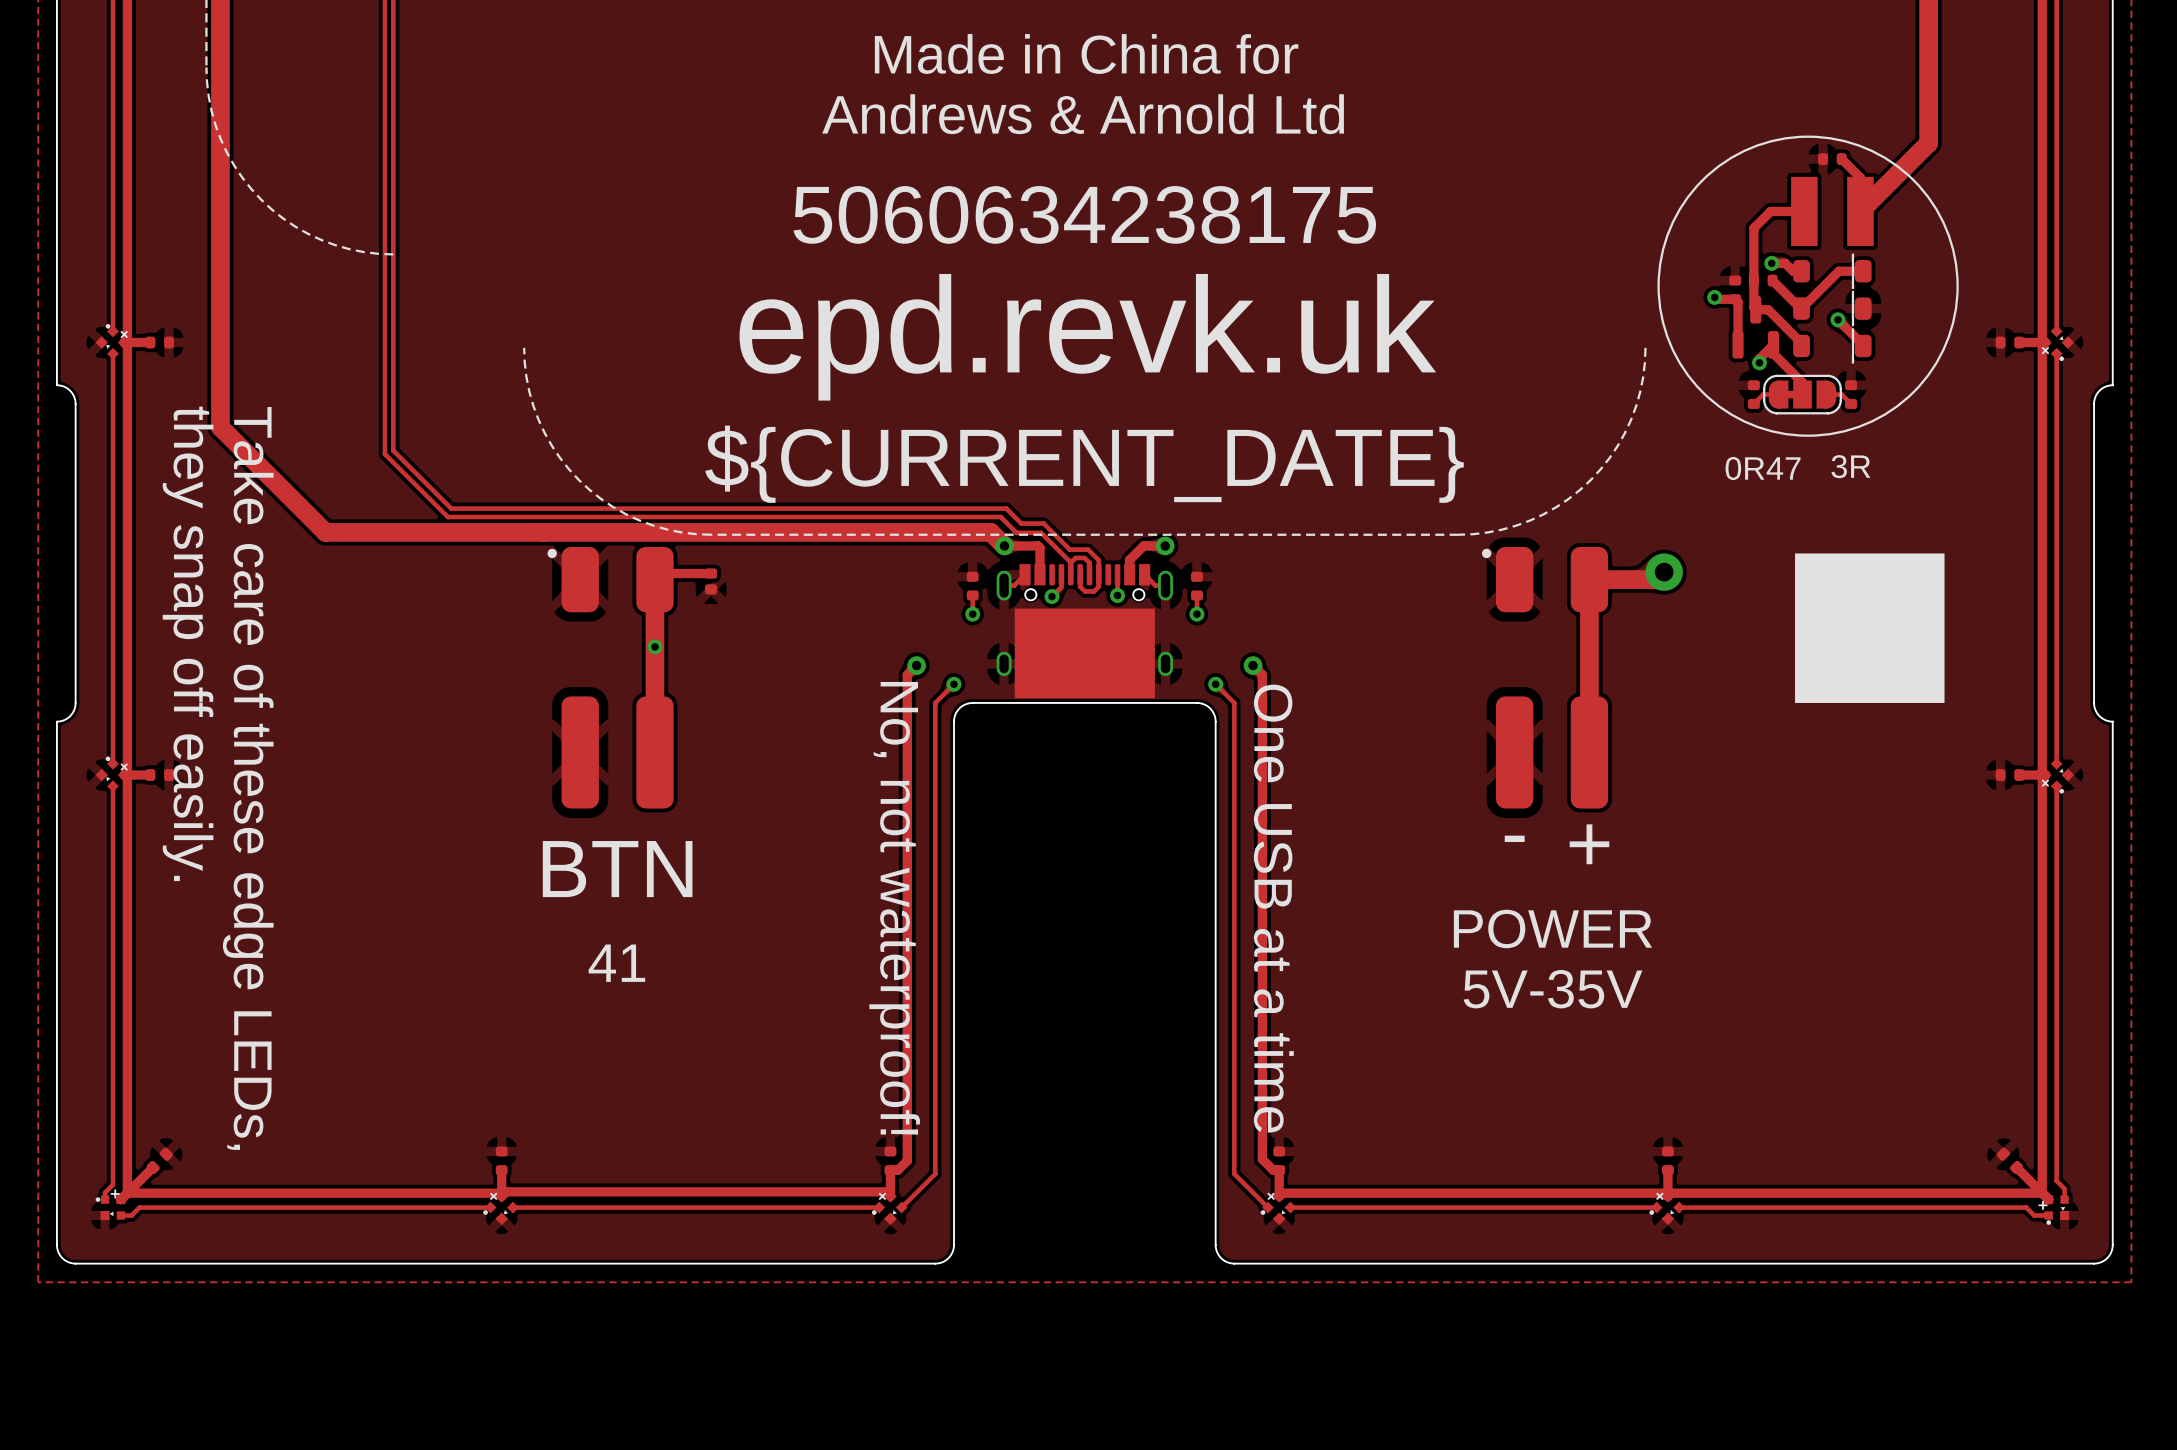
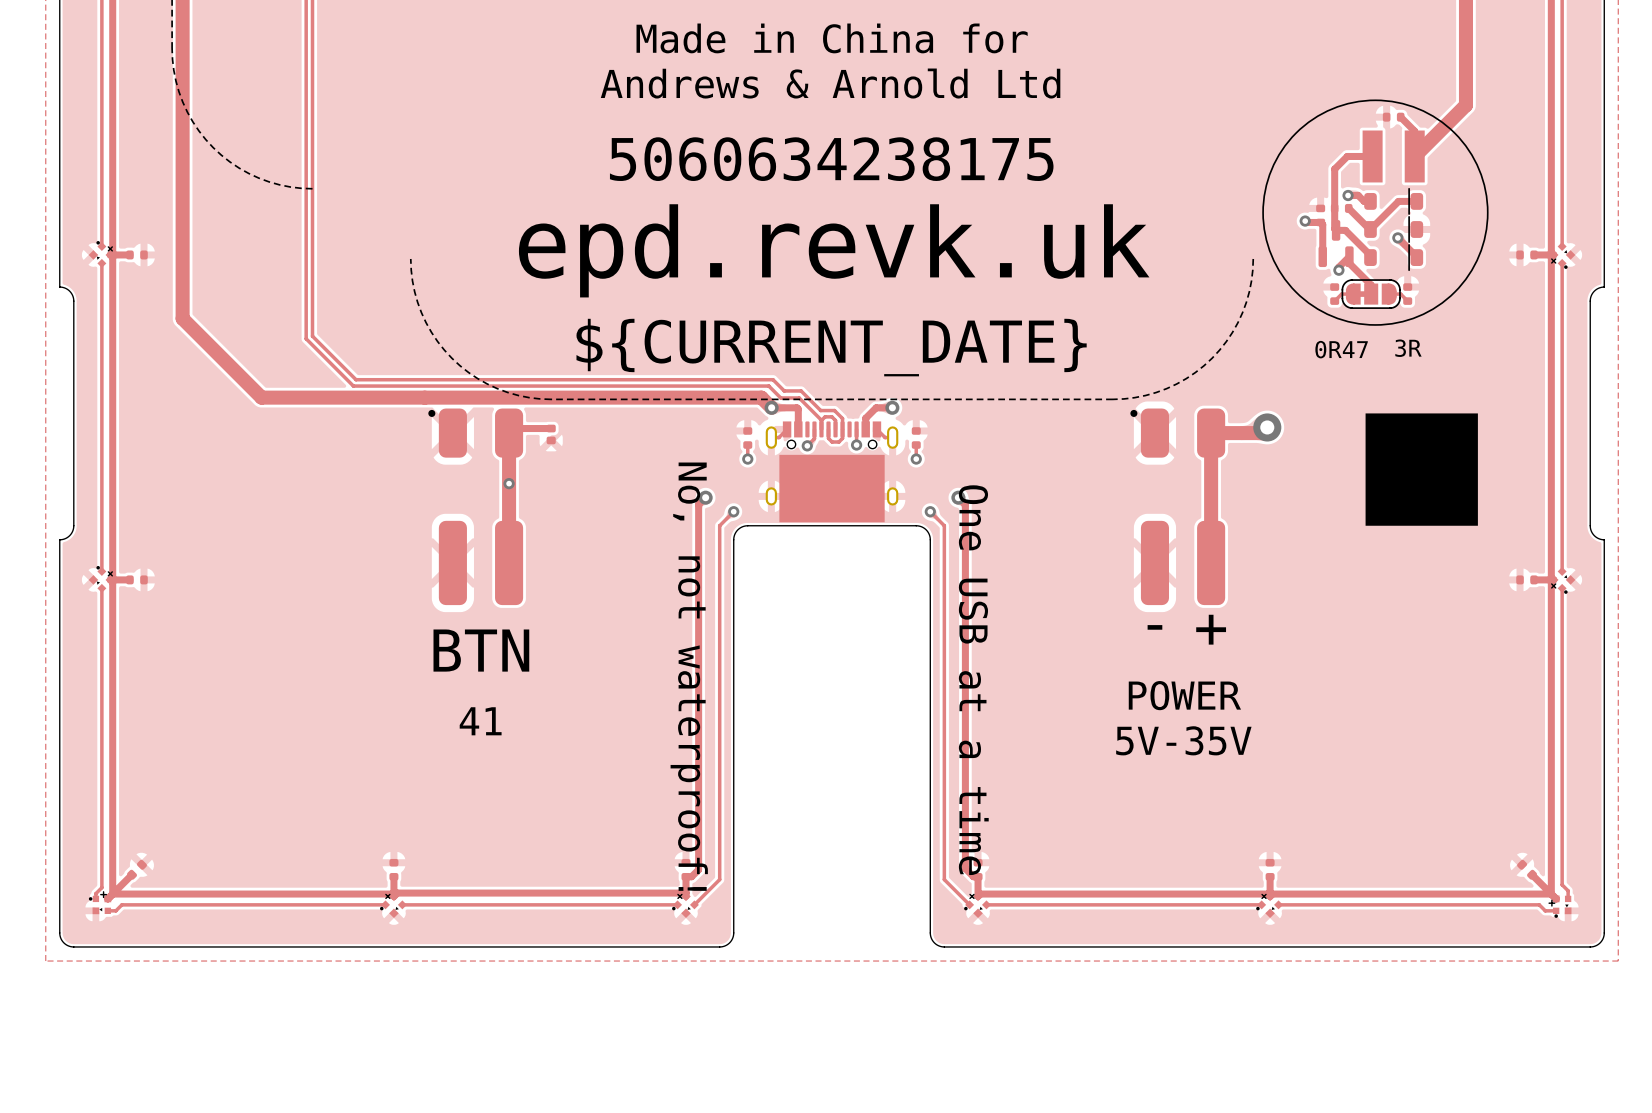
text: they snap off easily. (188, 643) -> none
text: Take care of these edge LEDs, (248, 778) -> none

